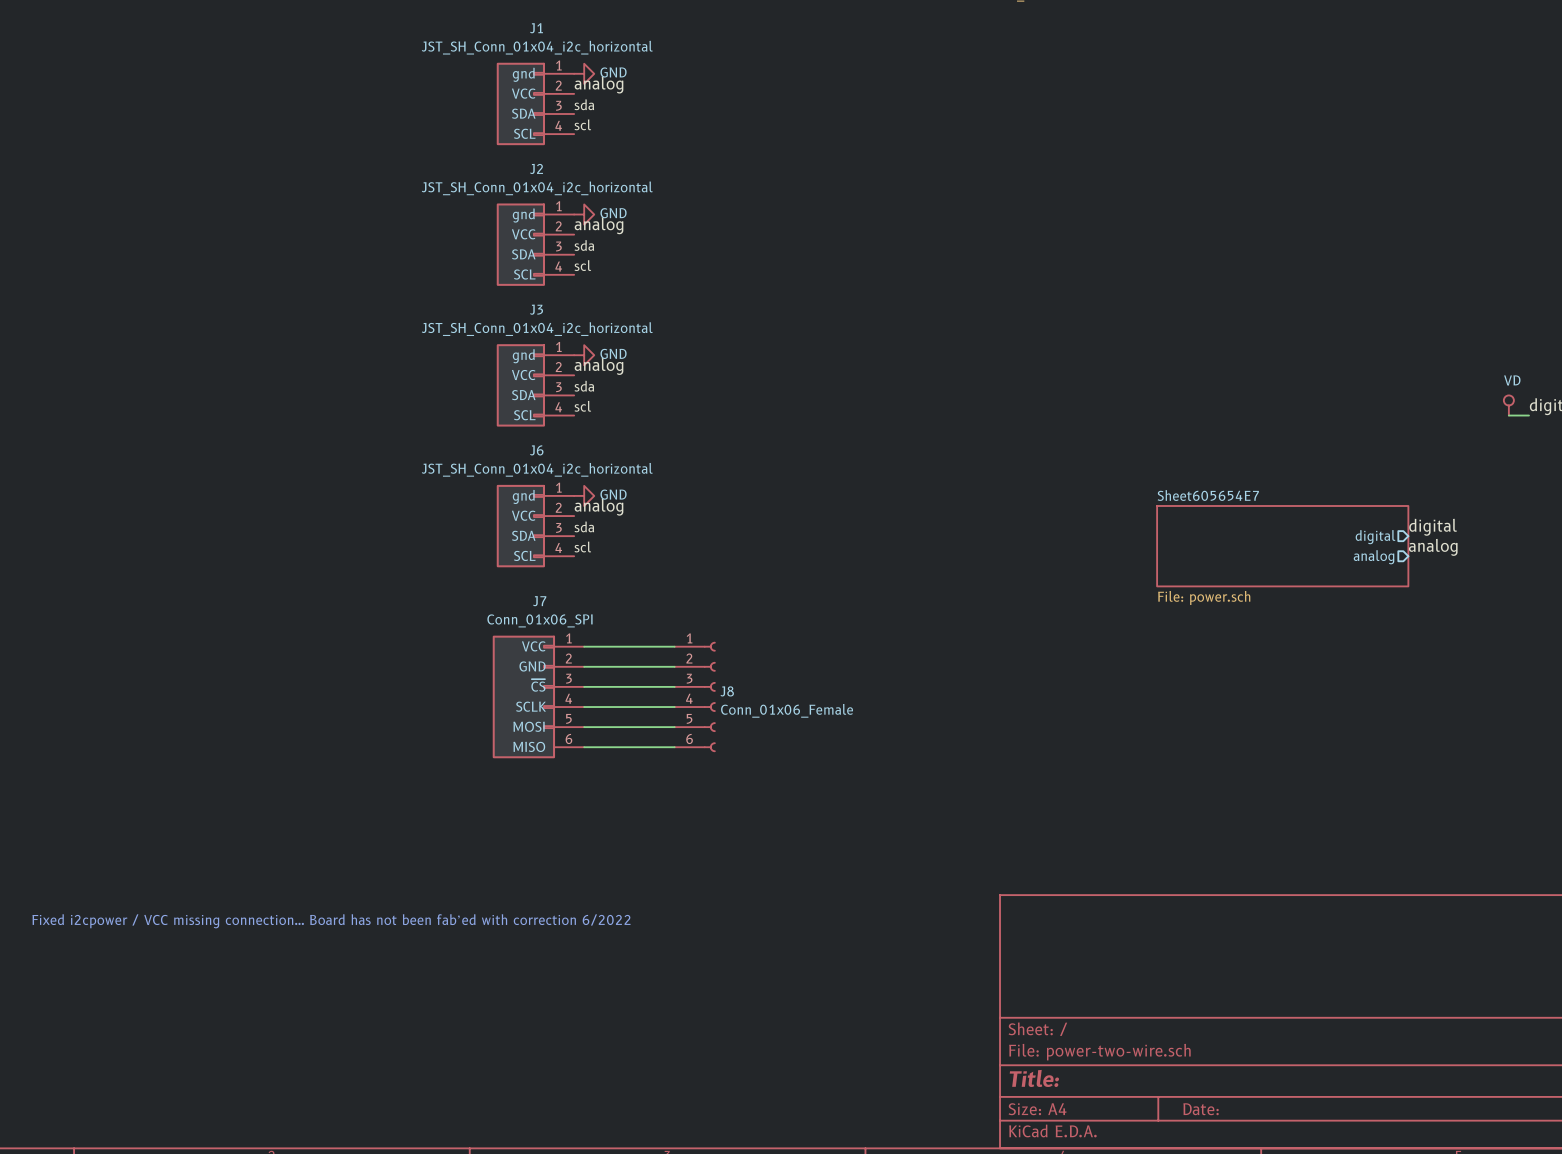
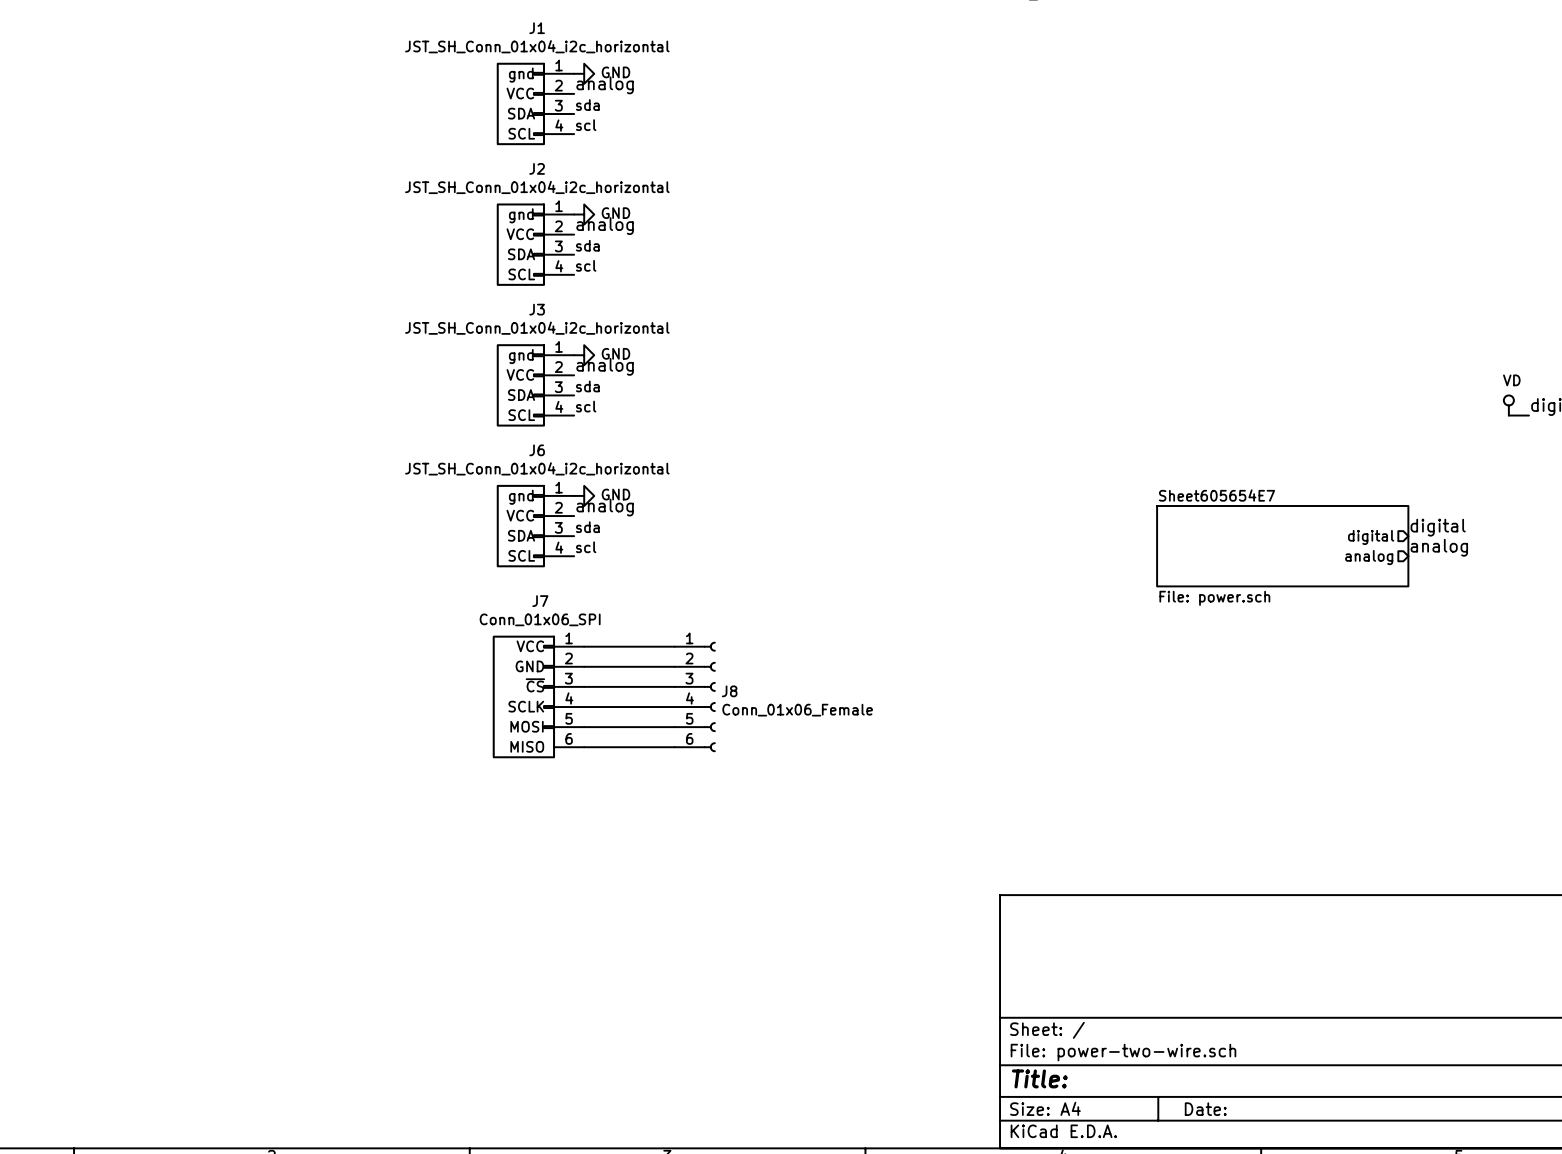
text: Fixed i2cpower / VCC missing connection… Board has not been fab’ed with correction 6/2022 (331, 921) -> none

